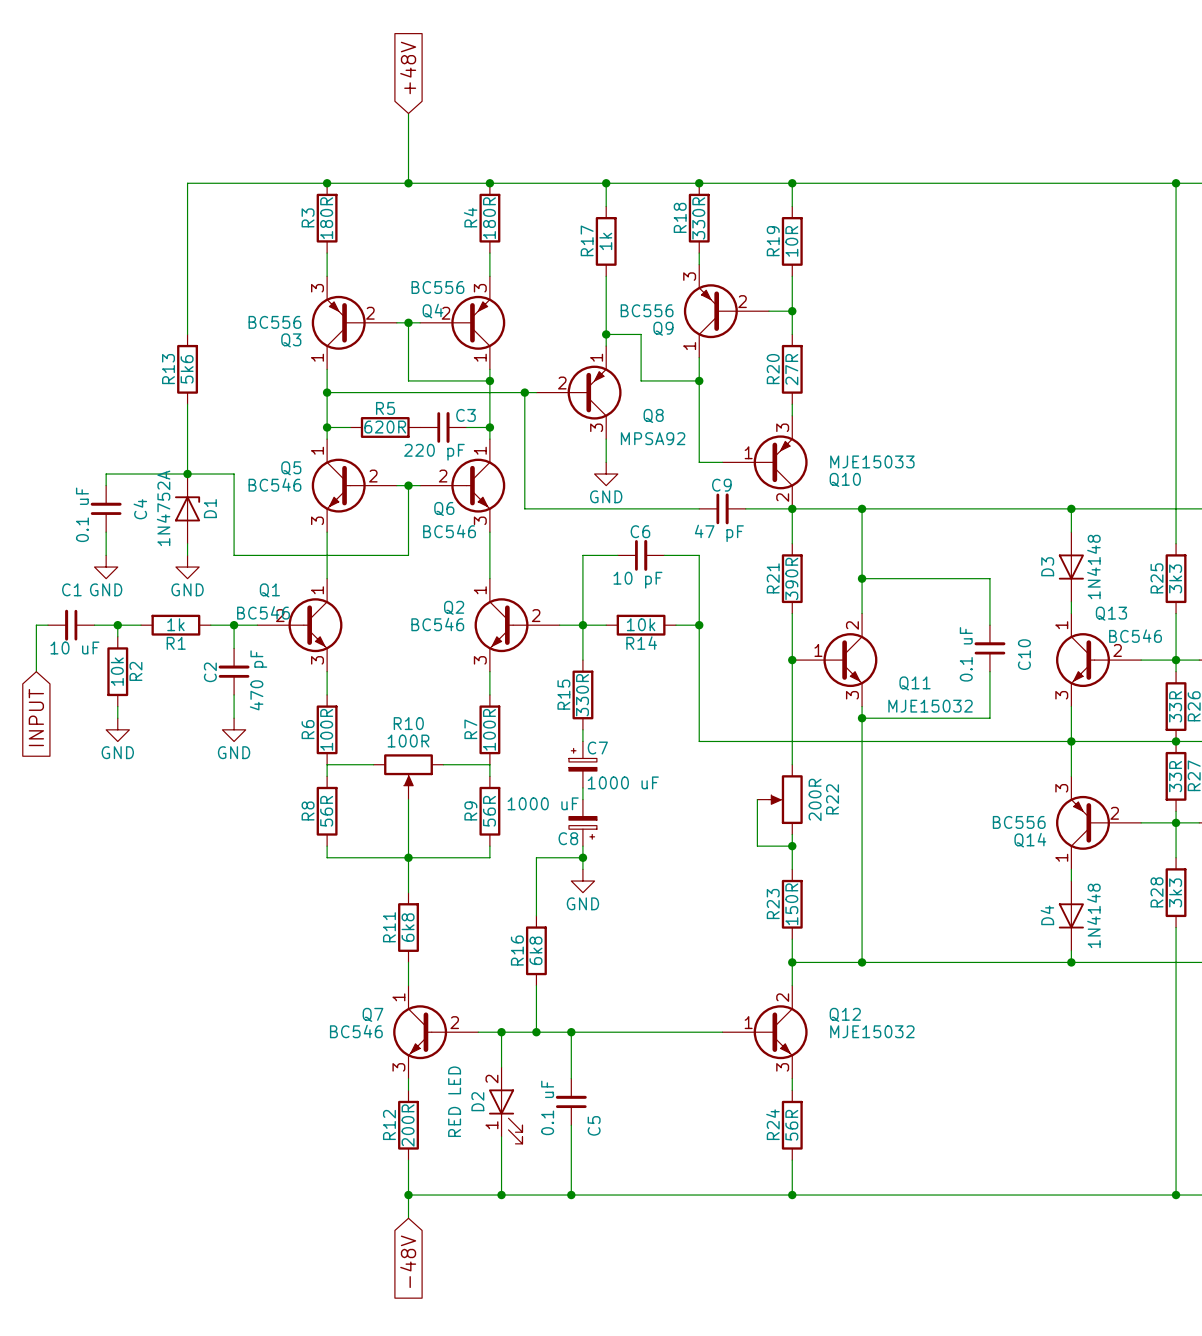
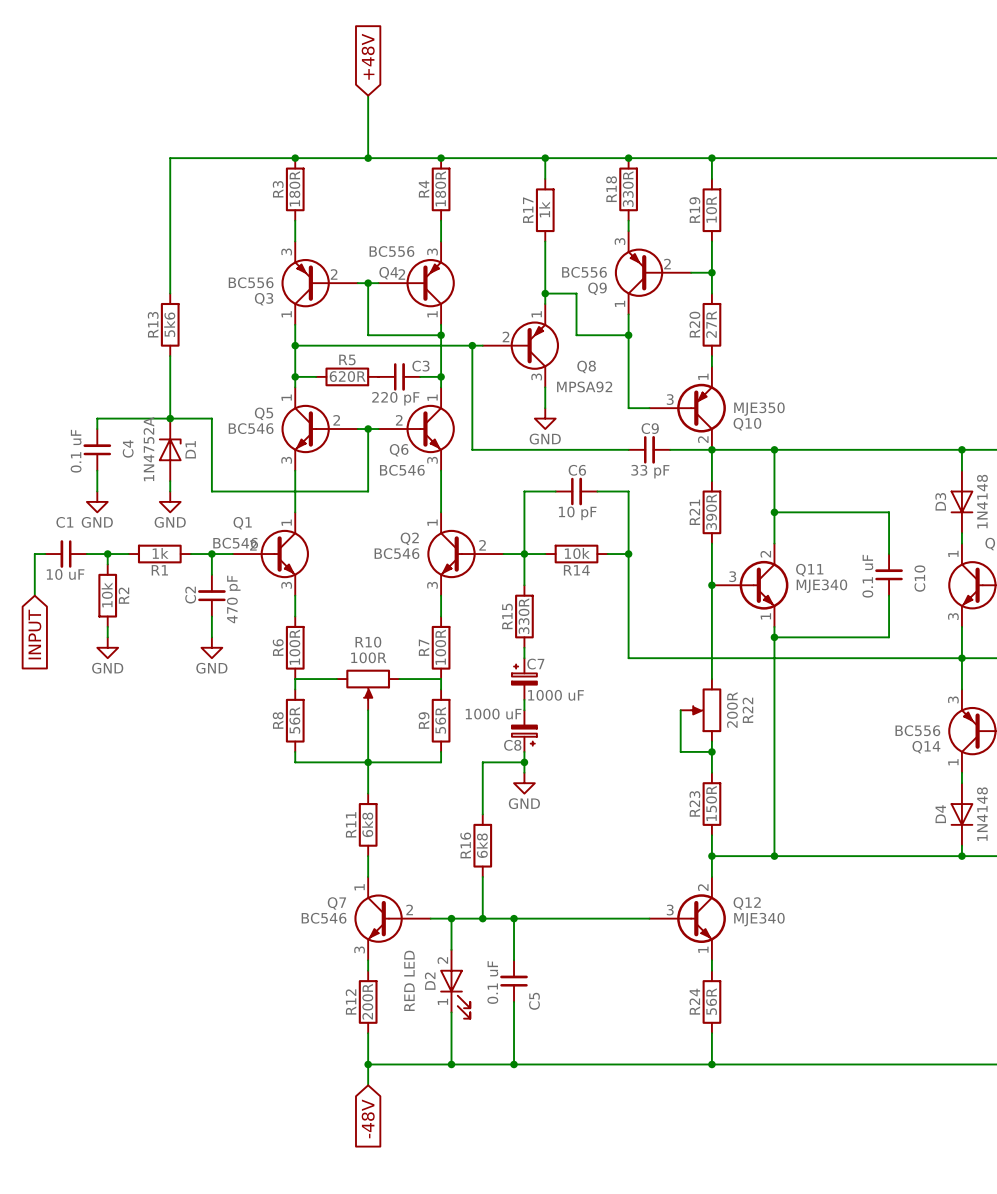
Q10 symbol: [722, 415, 808, 509] -> [649, 366, 726, 450]
Q10 value: MJE15033 (872, 461) -> MJE350 (759, 409)
C9 value: 47 pF (719, 533) -> 33 pF (650, 471)
Q11 symbol: [792, 613, 878, 707] -> [711, 543, 789, 627]
Q11 name position: Q11 (915, 683) -> Q11 (809, 570)
Q11 value: MJE15032 (930, 706) -> MJE340 (821, 586)
Q12 symbol: [722, 985, 808, 1079] -> [649, 876, 726, 961]
Q12 value: MJE15032 (872, 1031) -> MJE340 (759, 919)

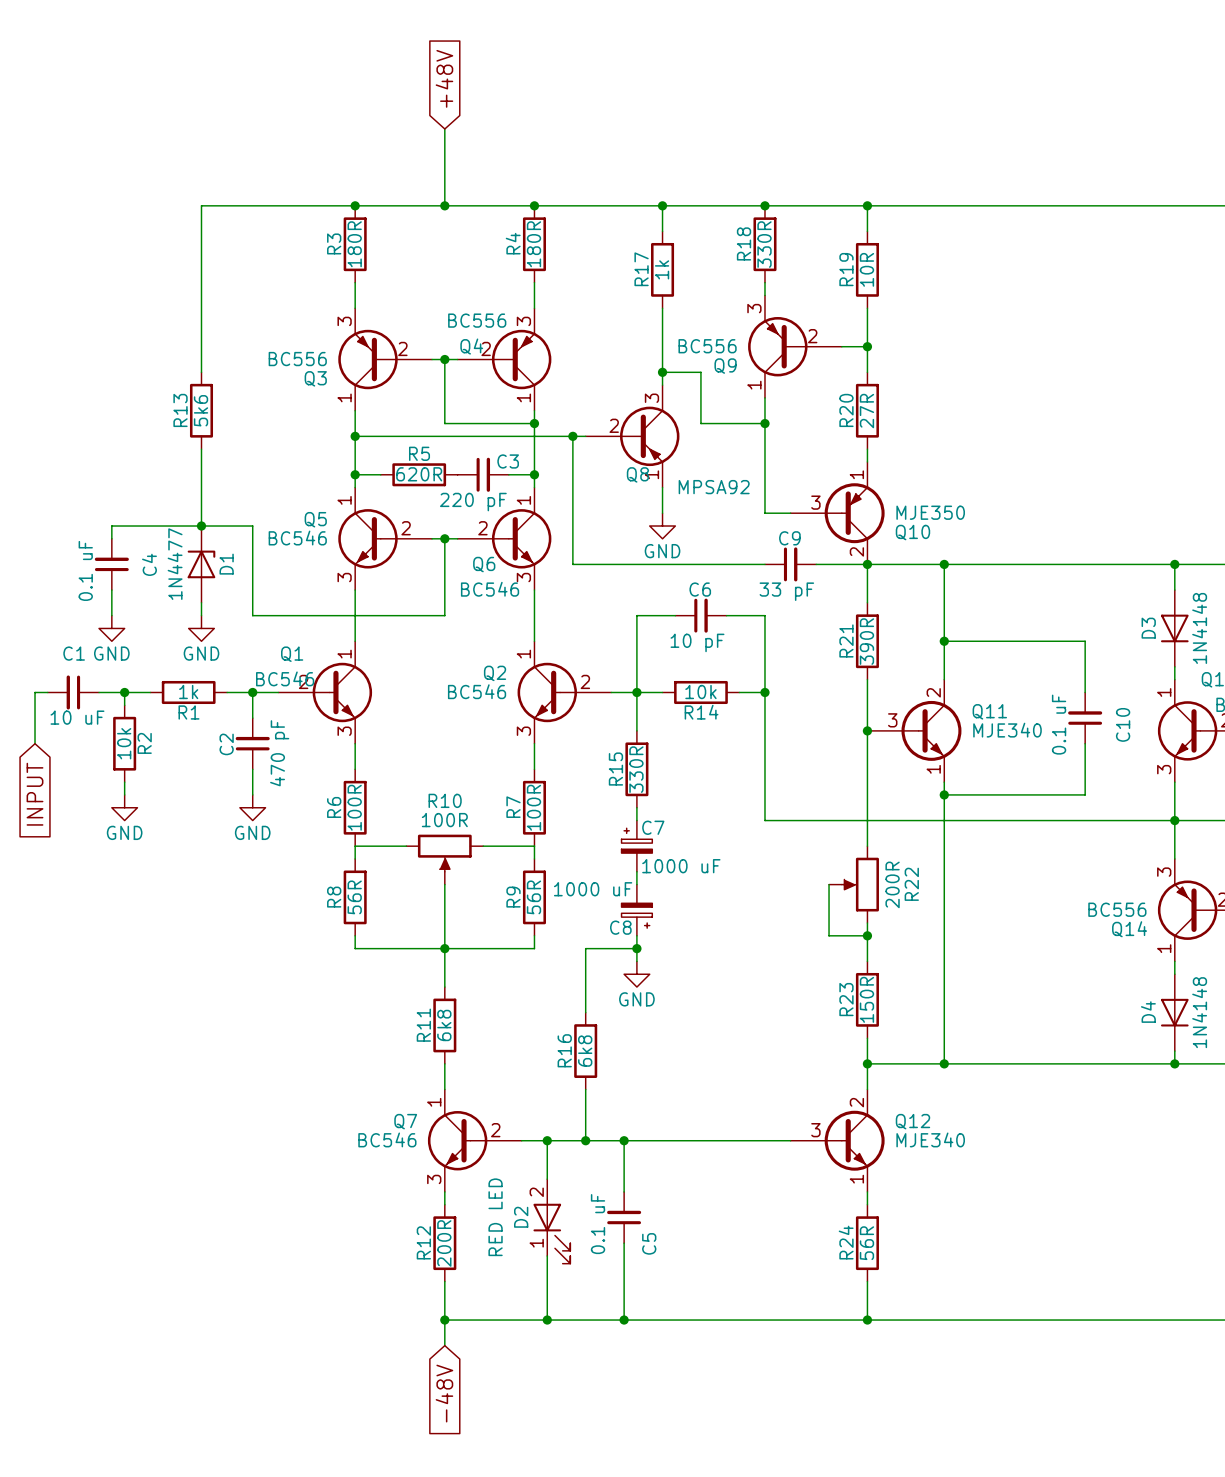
Q8 flip: as is (534, 345) -> up-down (649, 436)
Q8 name position: Q8 (586, 366) -> Q8 (637, 474)
D1 value: 1N4752A (149, 449) -> 1N4477 (175, 564)

